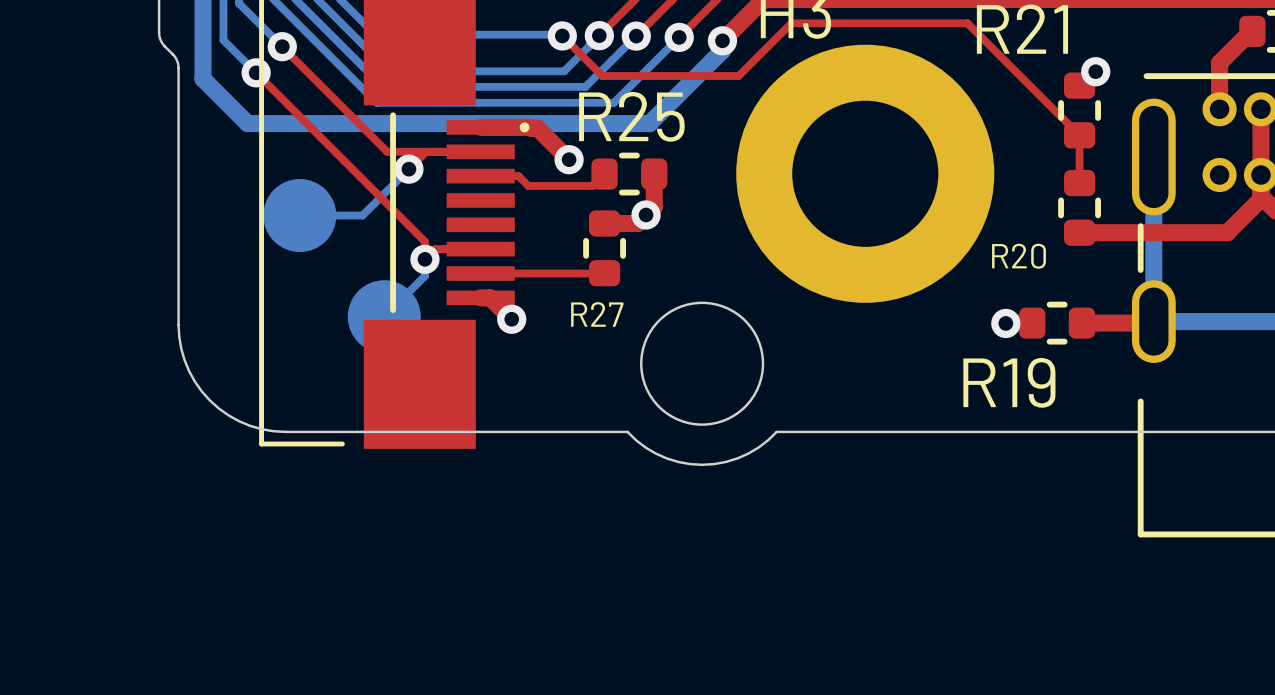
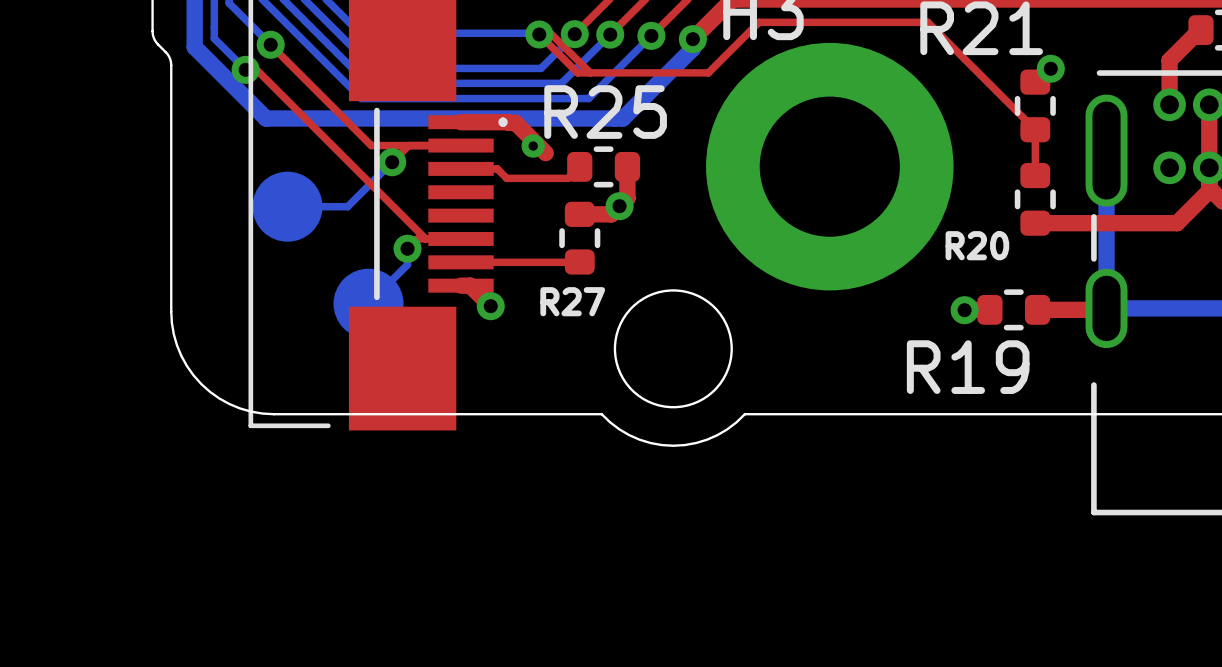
top track: none -> (550, 33) (590, 72)
bottom track: (203, 49) (203, 78) (247, 123) (277, 123) -> (194, 47) (266, 118)
top track: (256, 72) (424, 241) (424, 259) -> none
top track: none -> (256, 69) (425, 238)
via position: (569, 159) -> (533, 146)

